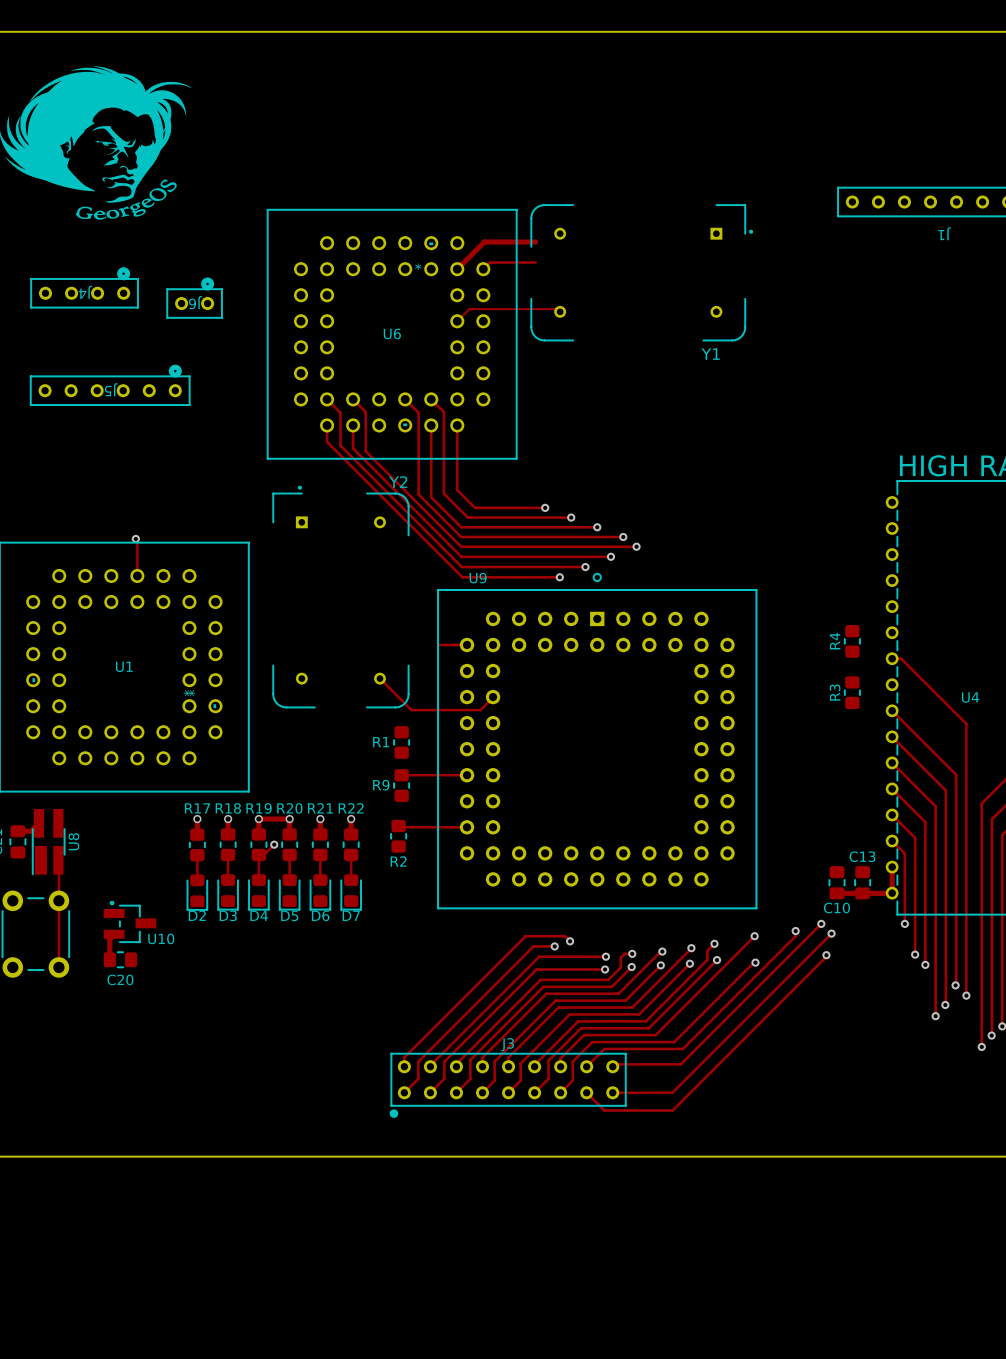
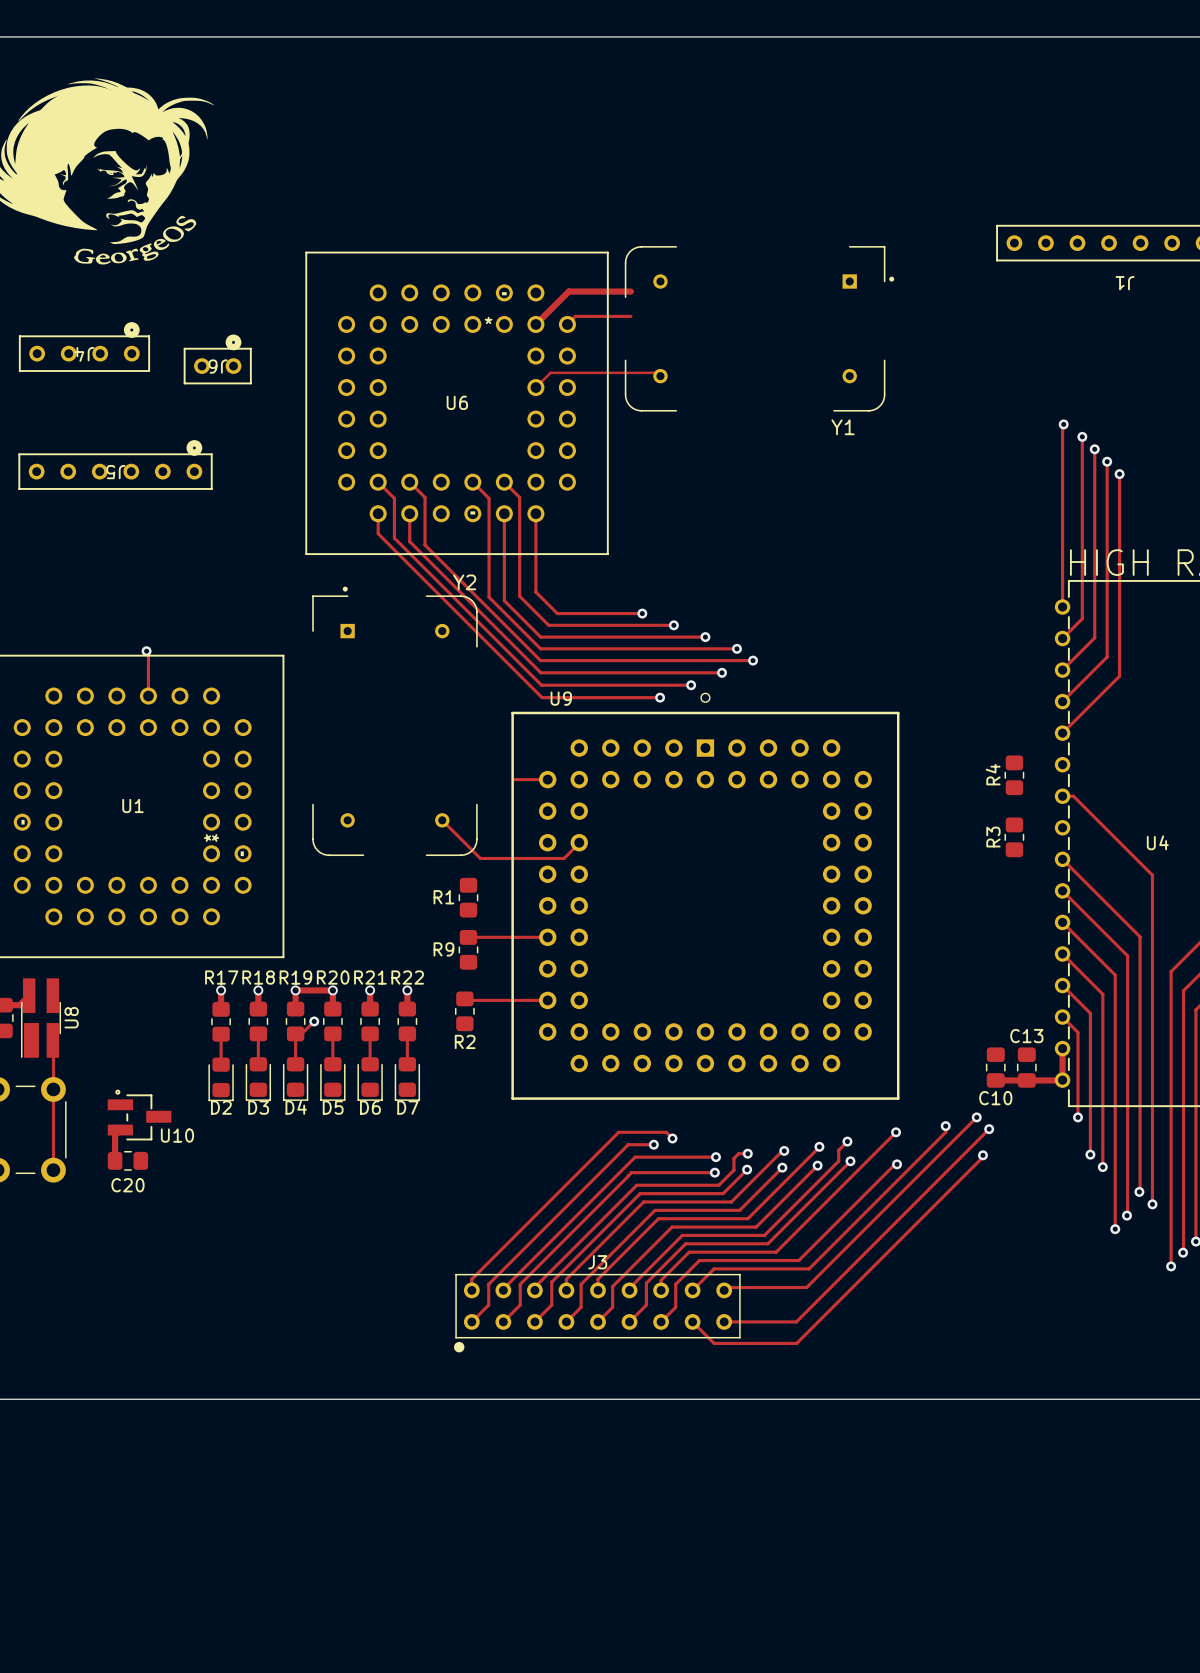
track: none -> (1063, 424) (1062, 606)
via: none -> (1063, 424)
track: none -> (1082, 436) (1082, 618) (1062, 638)
via: none -> (1082, 436)
track: none -> (1094, 449) (1094, 637) (1062, 670)
via: none -> (1094, 449)
track: none -> (1107, 461) (1107, 657) (1062, 701)
via: none -> (1107, 461)
track: none -> (1119, 474) (1119, 676) (1062, 733)
via: none -> (1119, 474)

